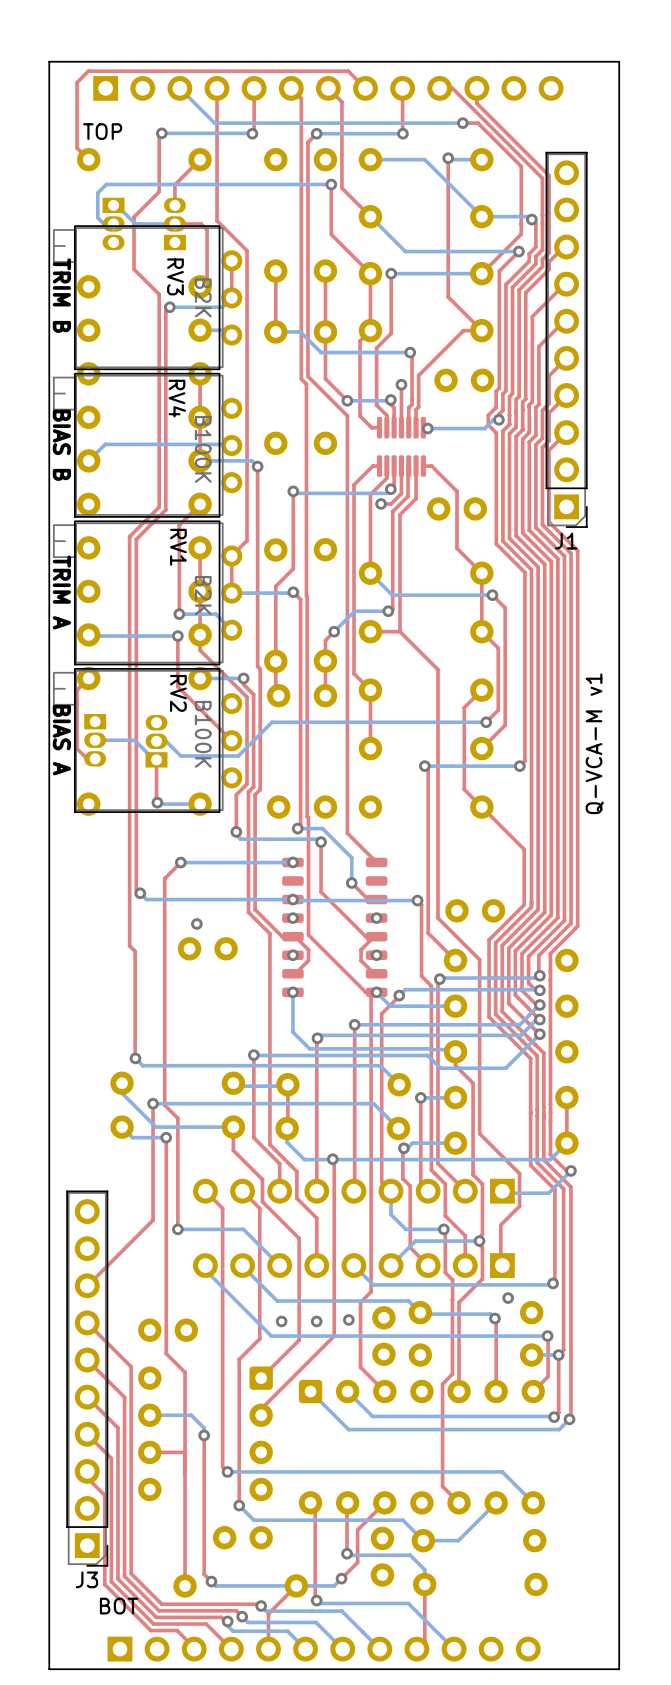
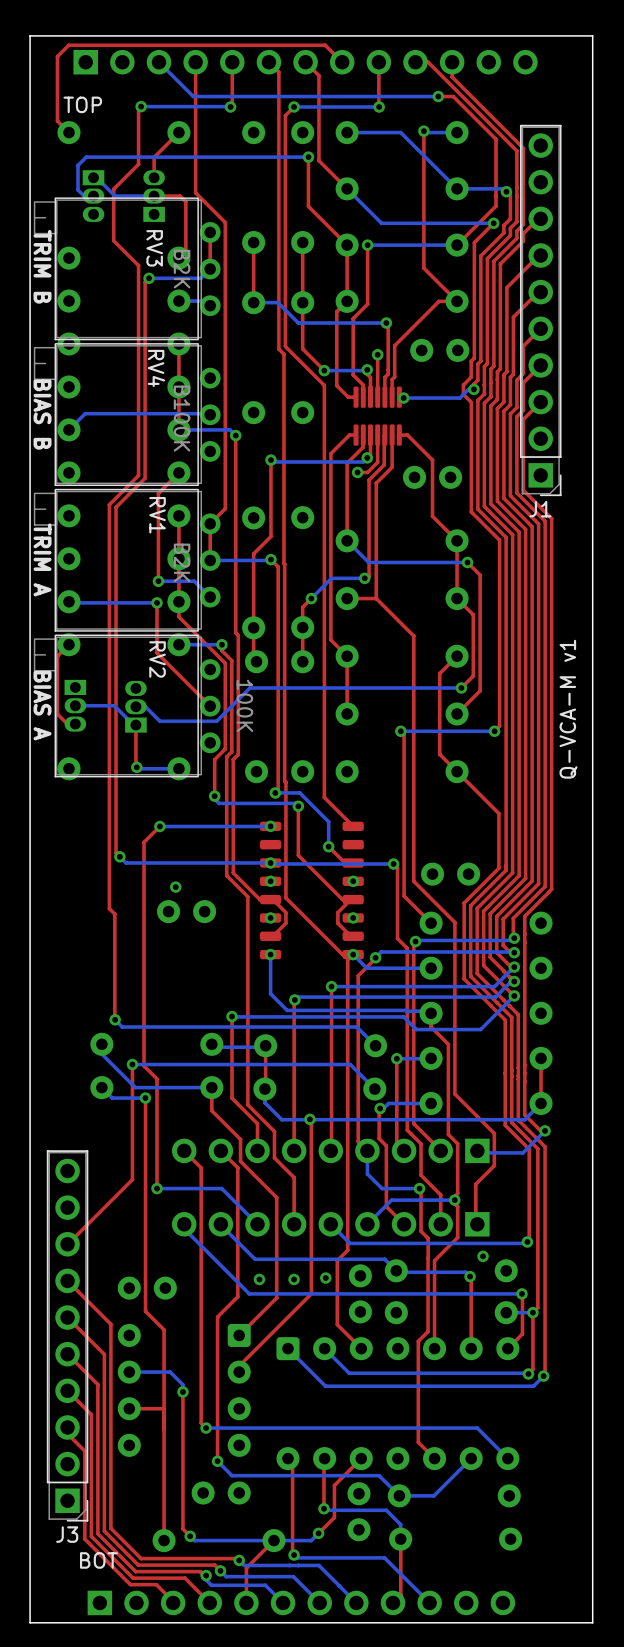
RV2 value: B100K (203, 734) -> 100K (244, 705)

